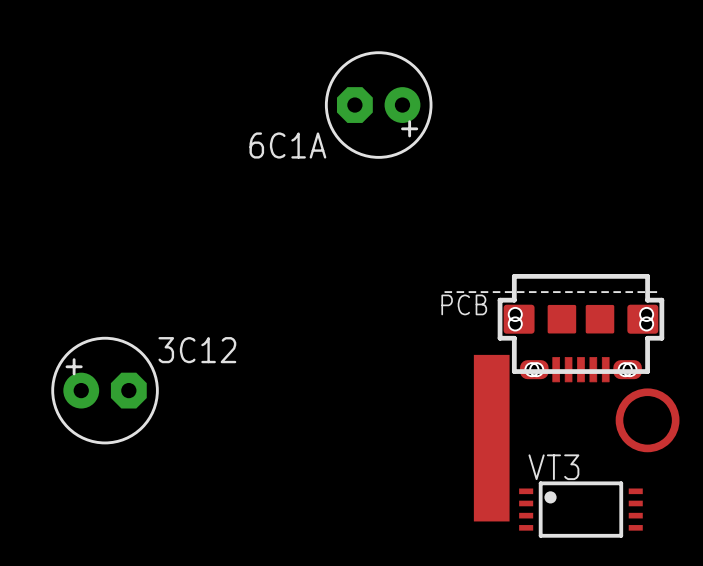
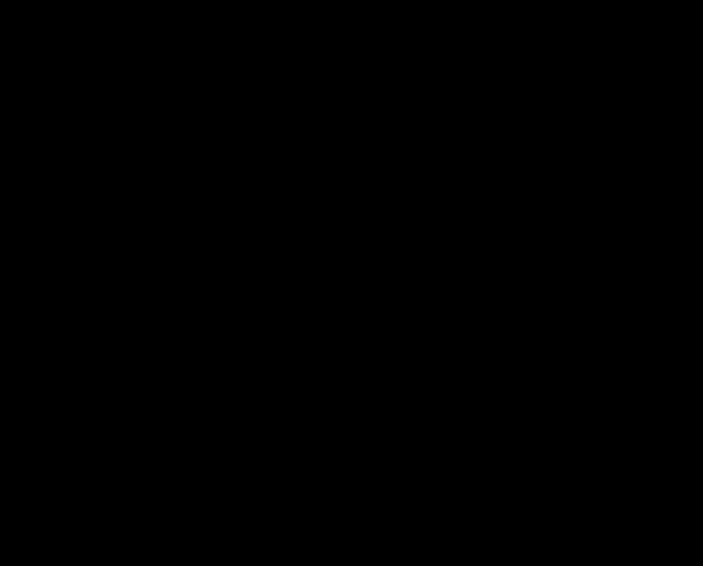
6C1A: (378, 105) -> none
part: (553, 328) -> none
drawing: [473, 354, 510, 522] -> none
drawing: [615, 388, 680, 453] -> none
3C12: (105, 390) -> none
VT3: (580, 509) -> none

